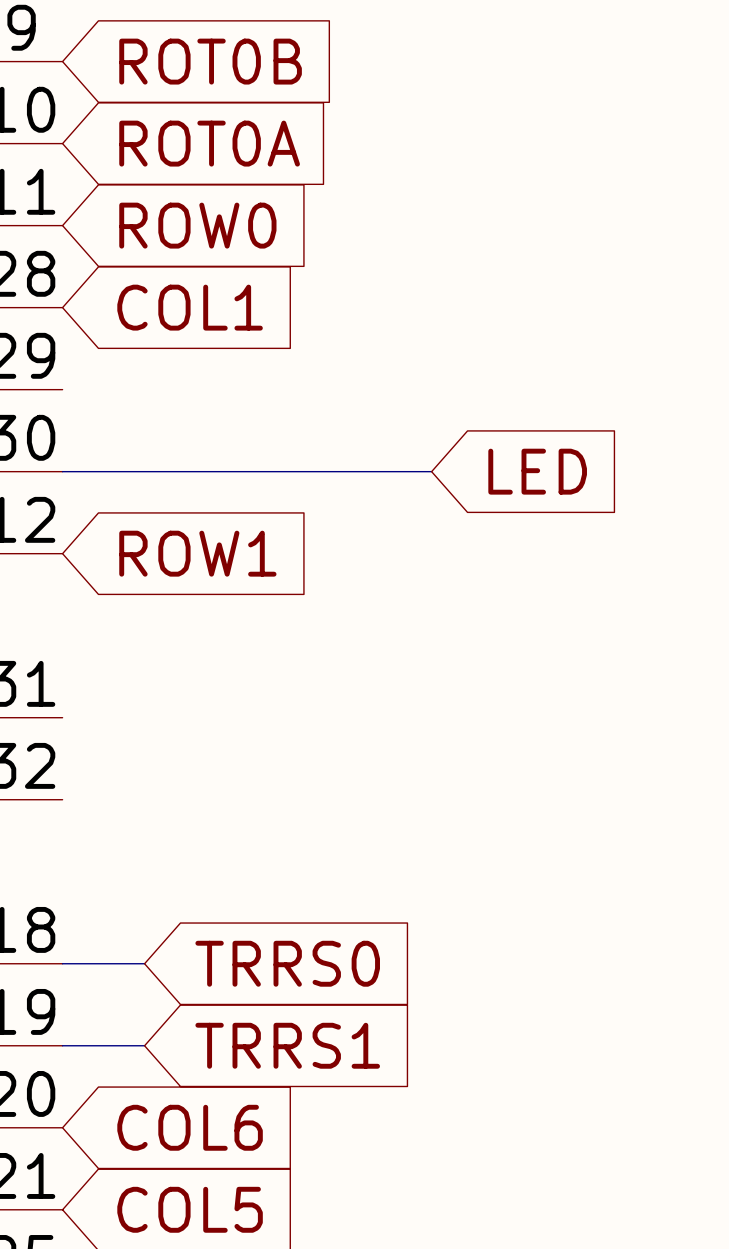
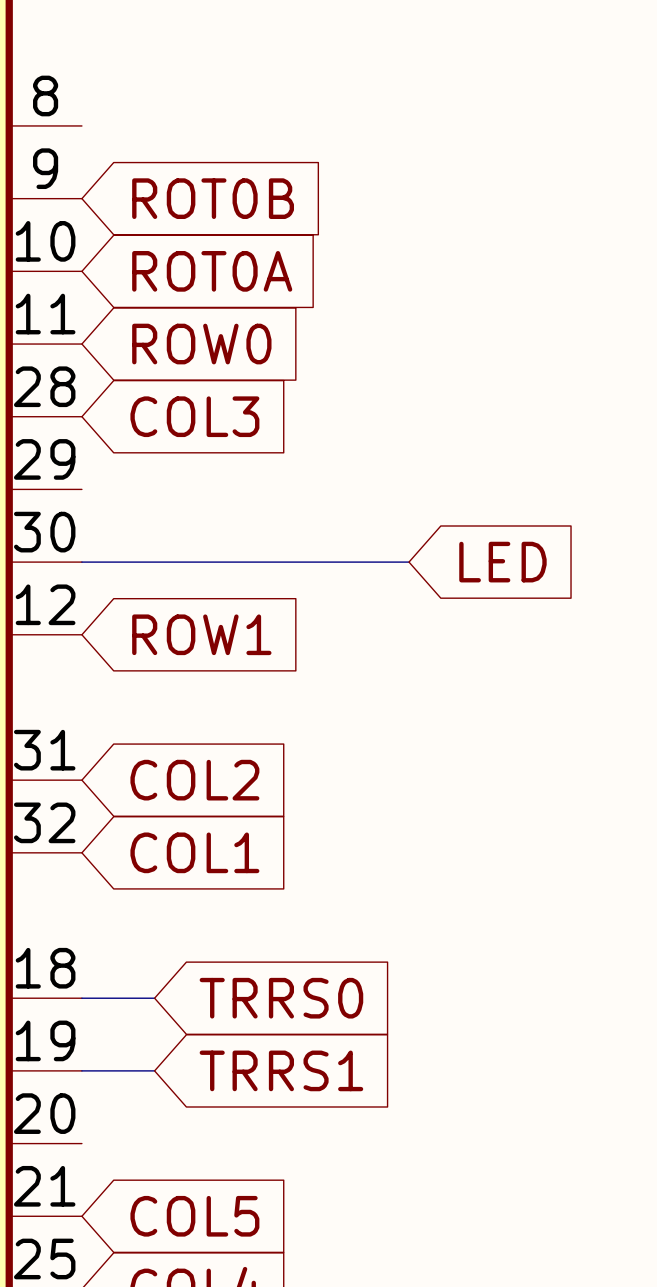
global label: COL1 (190, 307) -> COL3 (194, 416)
global label: none -> COL2 (194, 780)
global label: none -> COL1 (194, 852)
global label: COL6 (190, 1127) -> none

